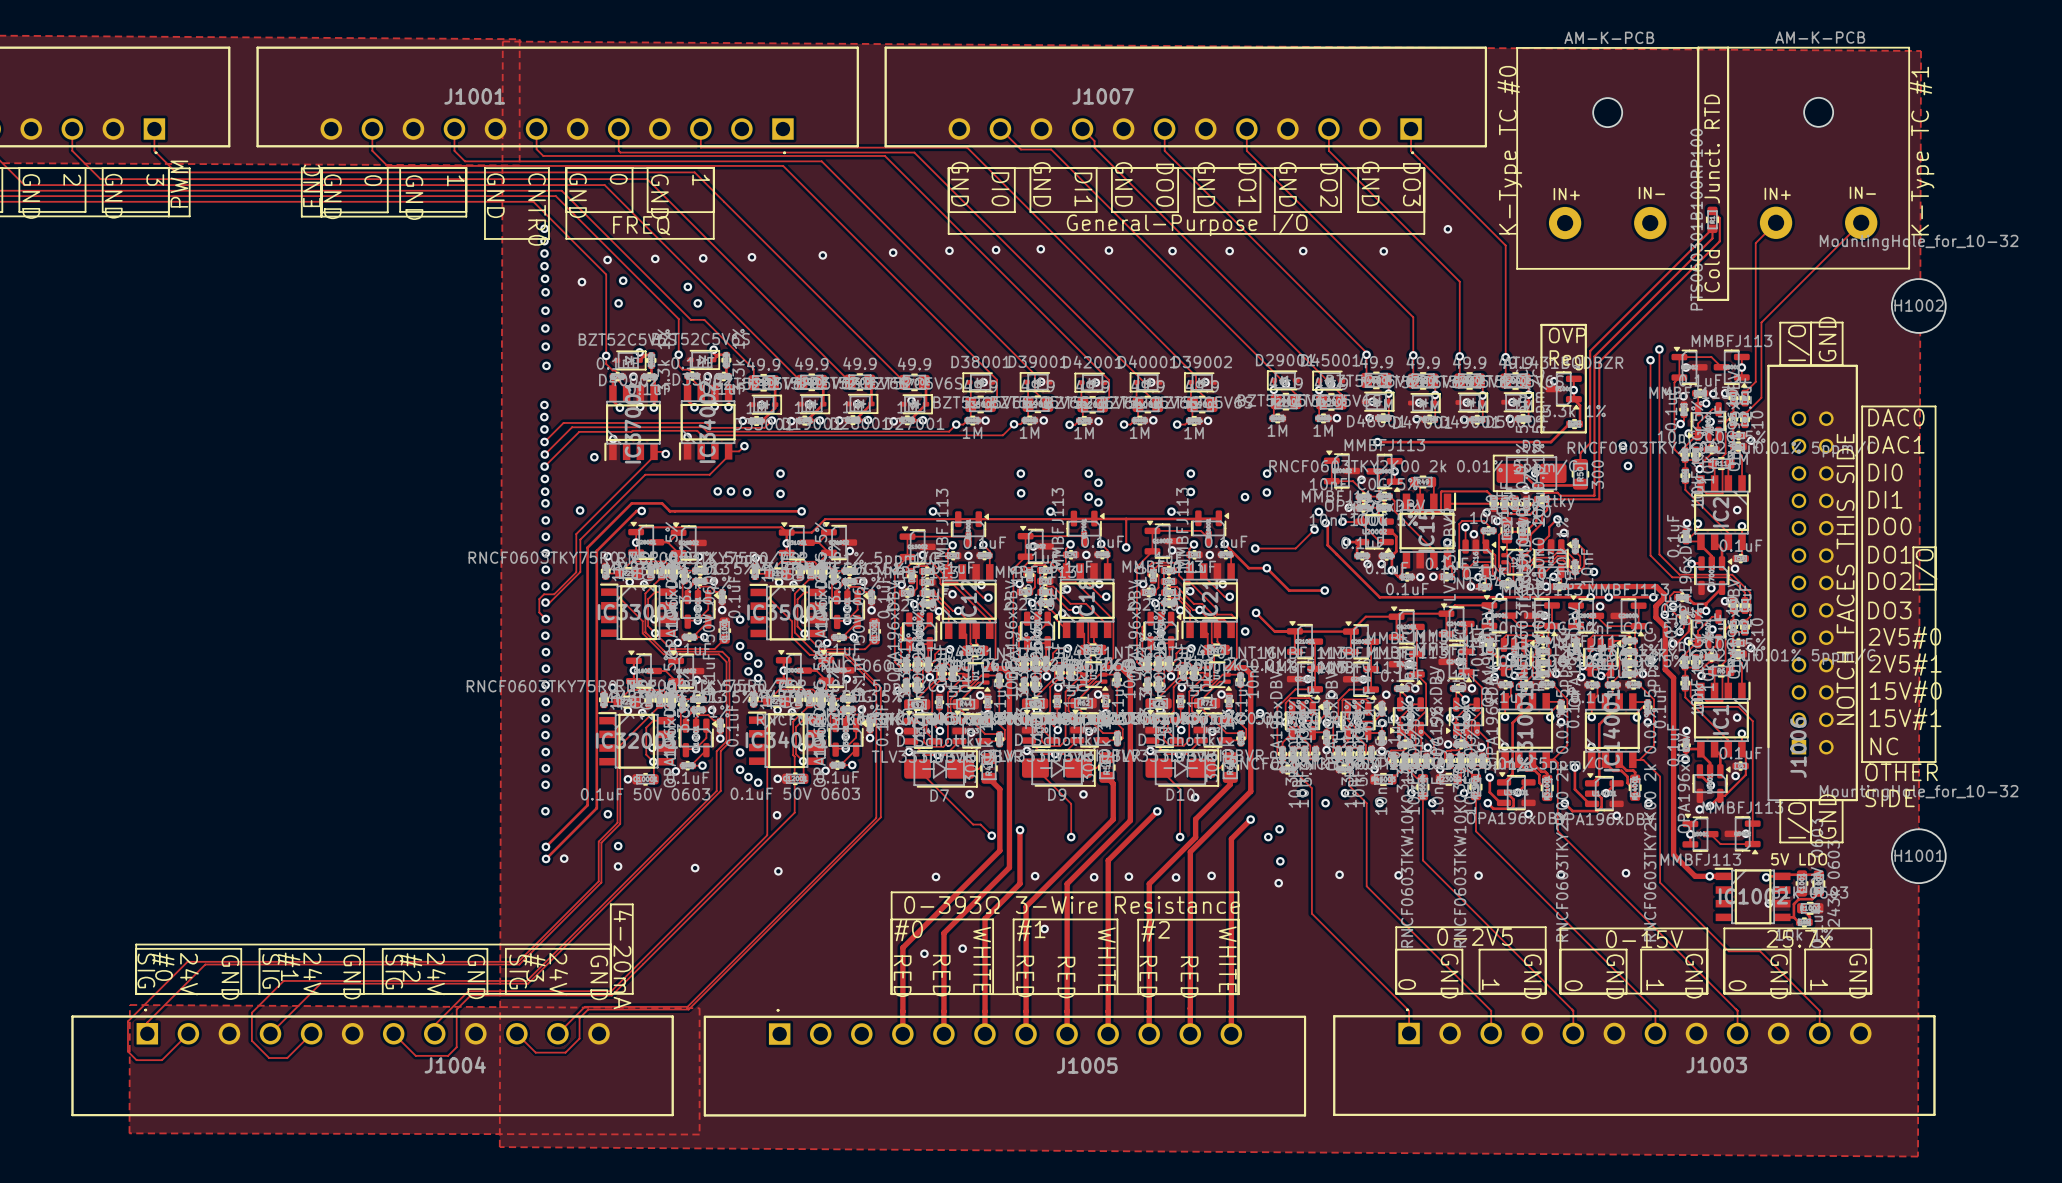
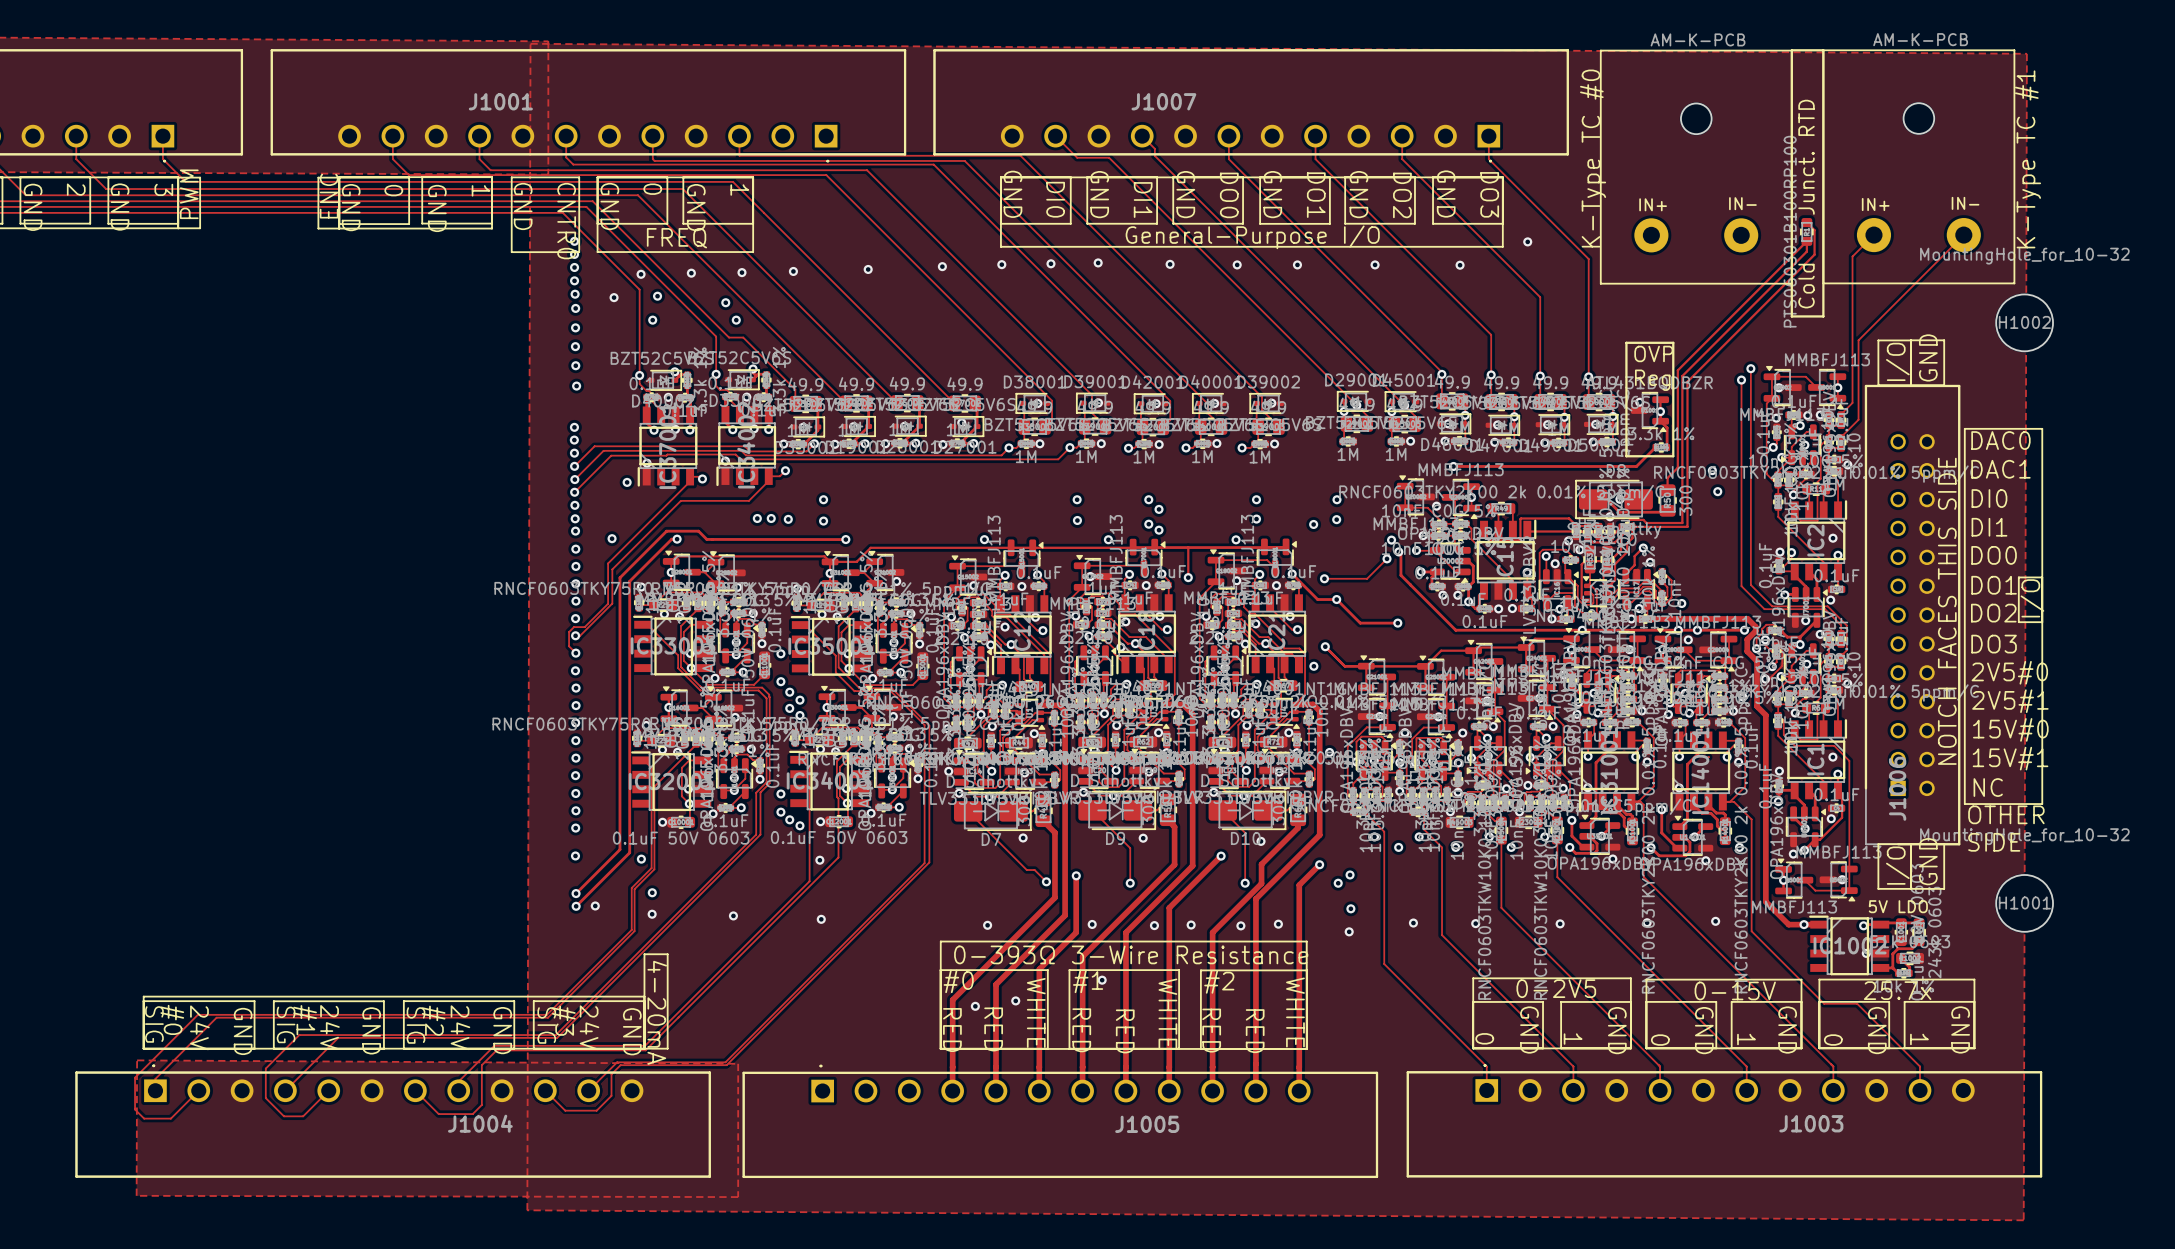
track: none -> (1708, 756) (1708, 757)

